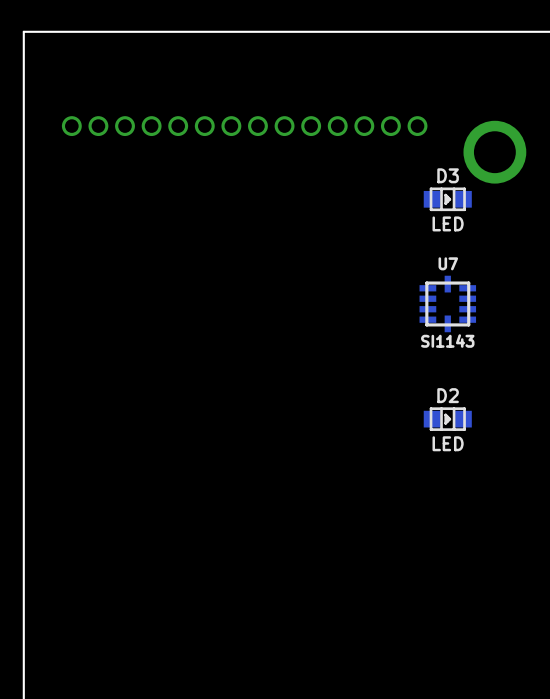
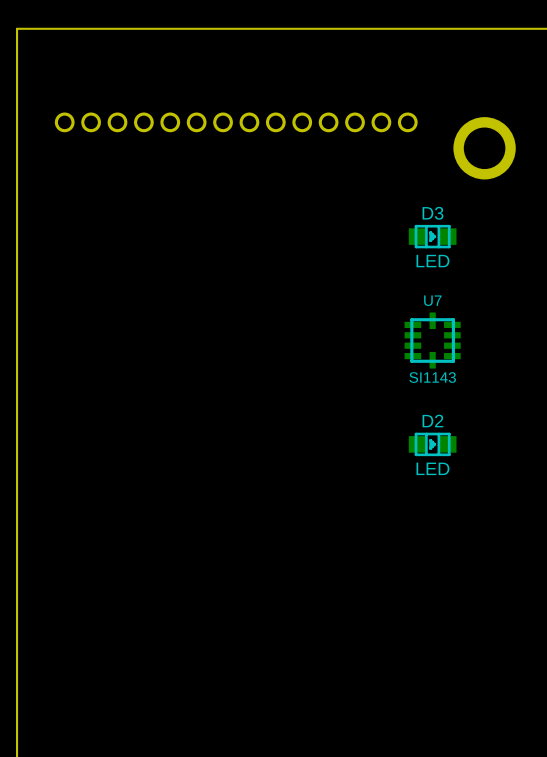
D3 position: (447, 199) -> (432, 236)
U7 position: (447, 303) -> (432, 340)
D2 position: (447, 419) -> (432, 444)

